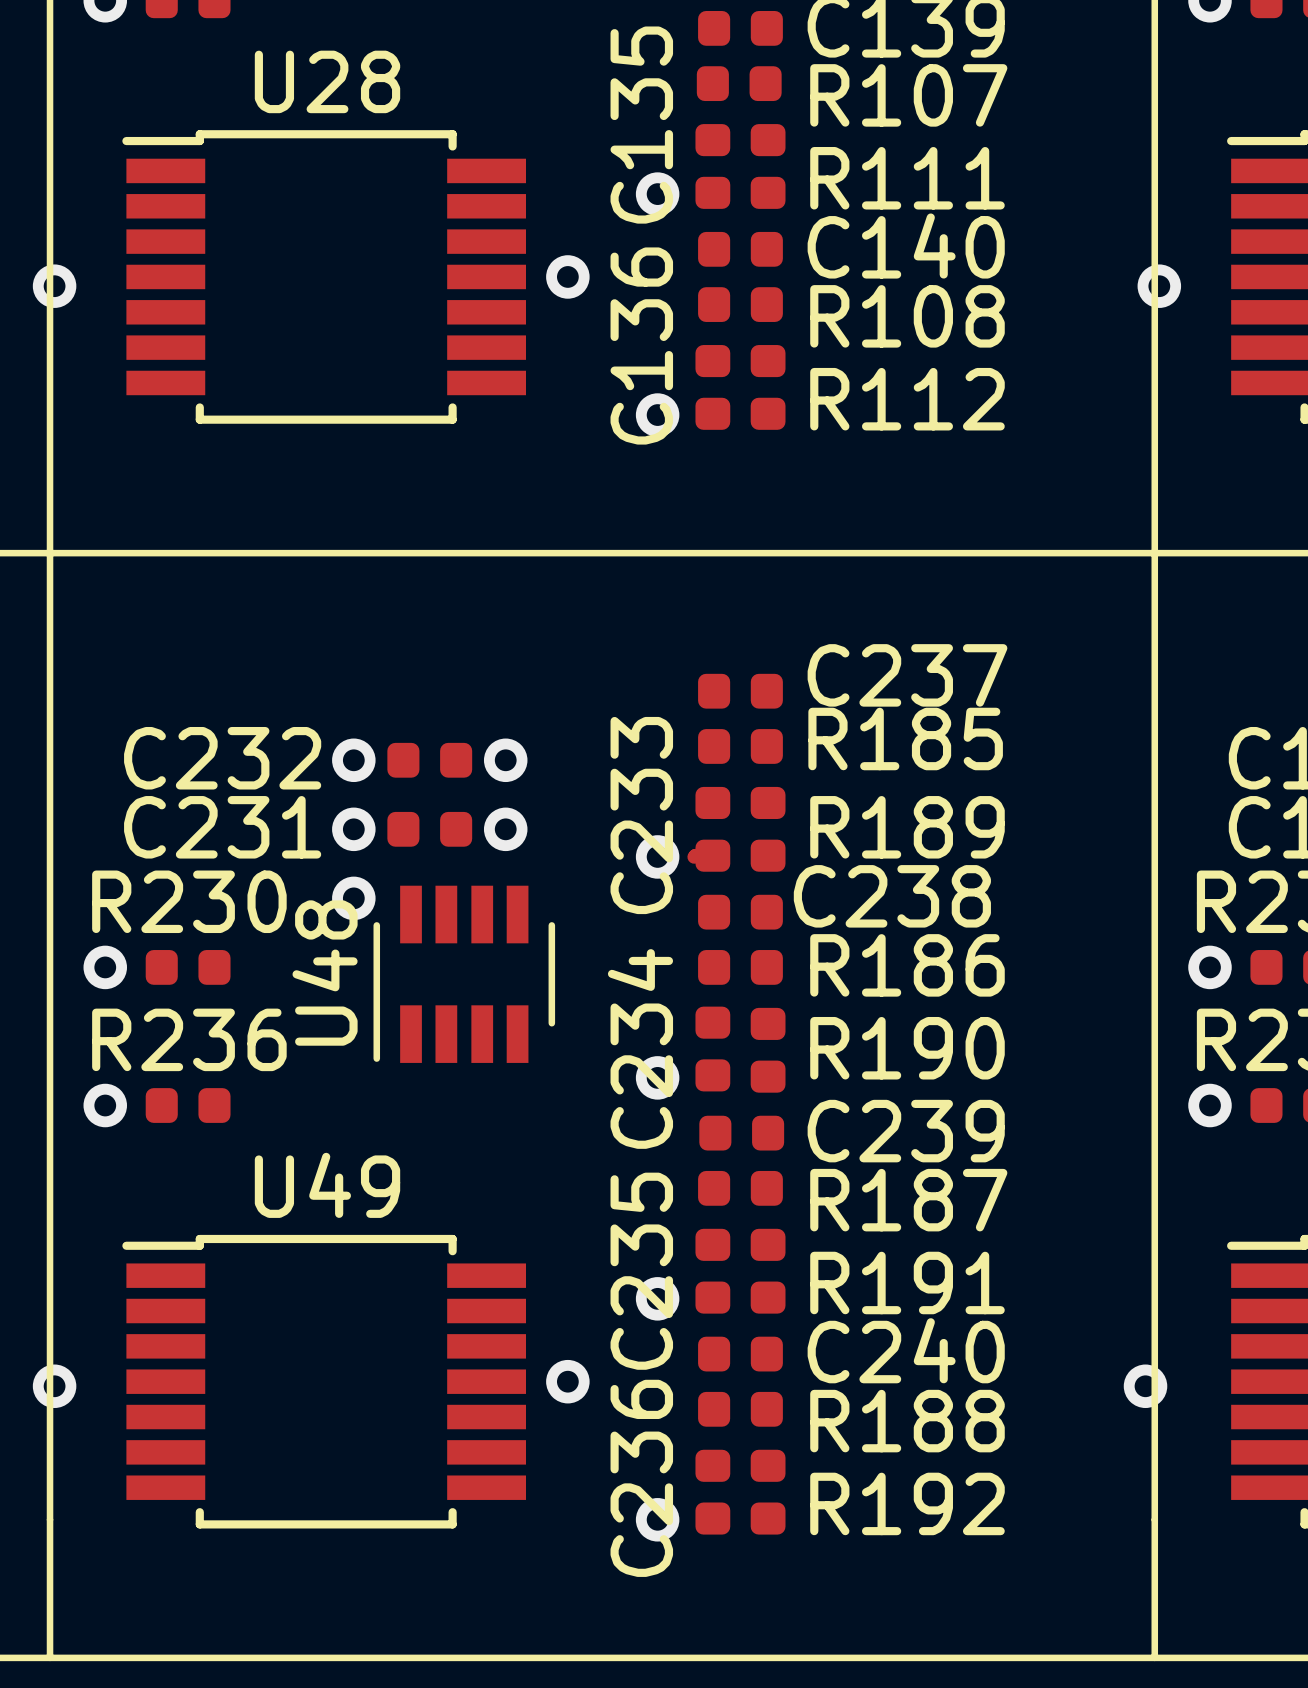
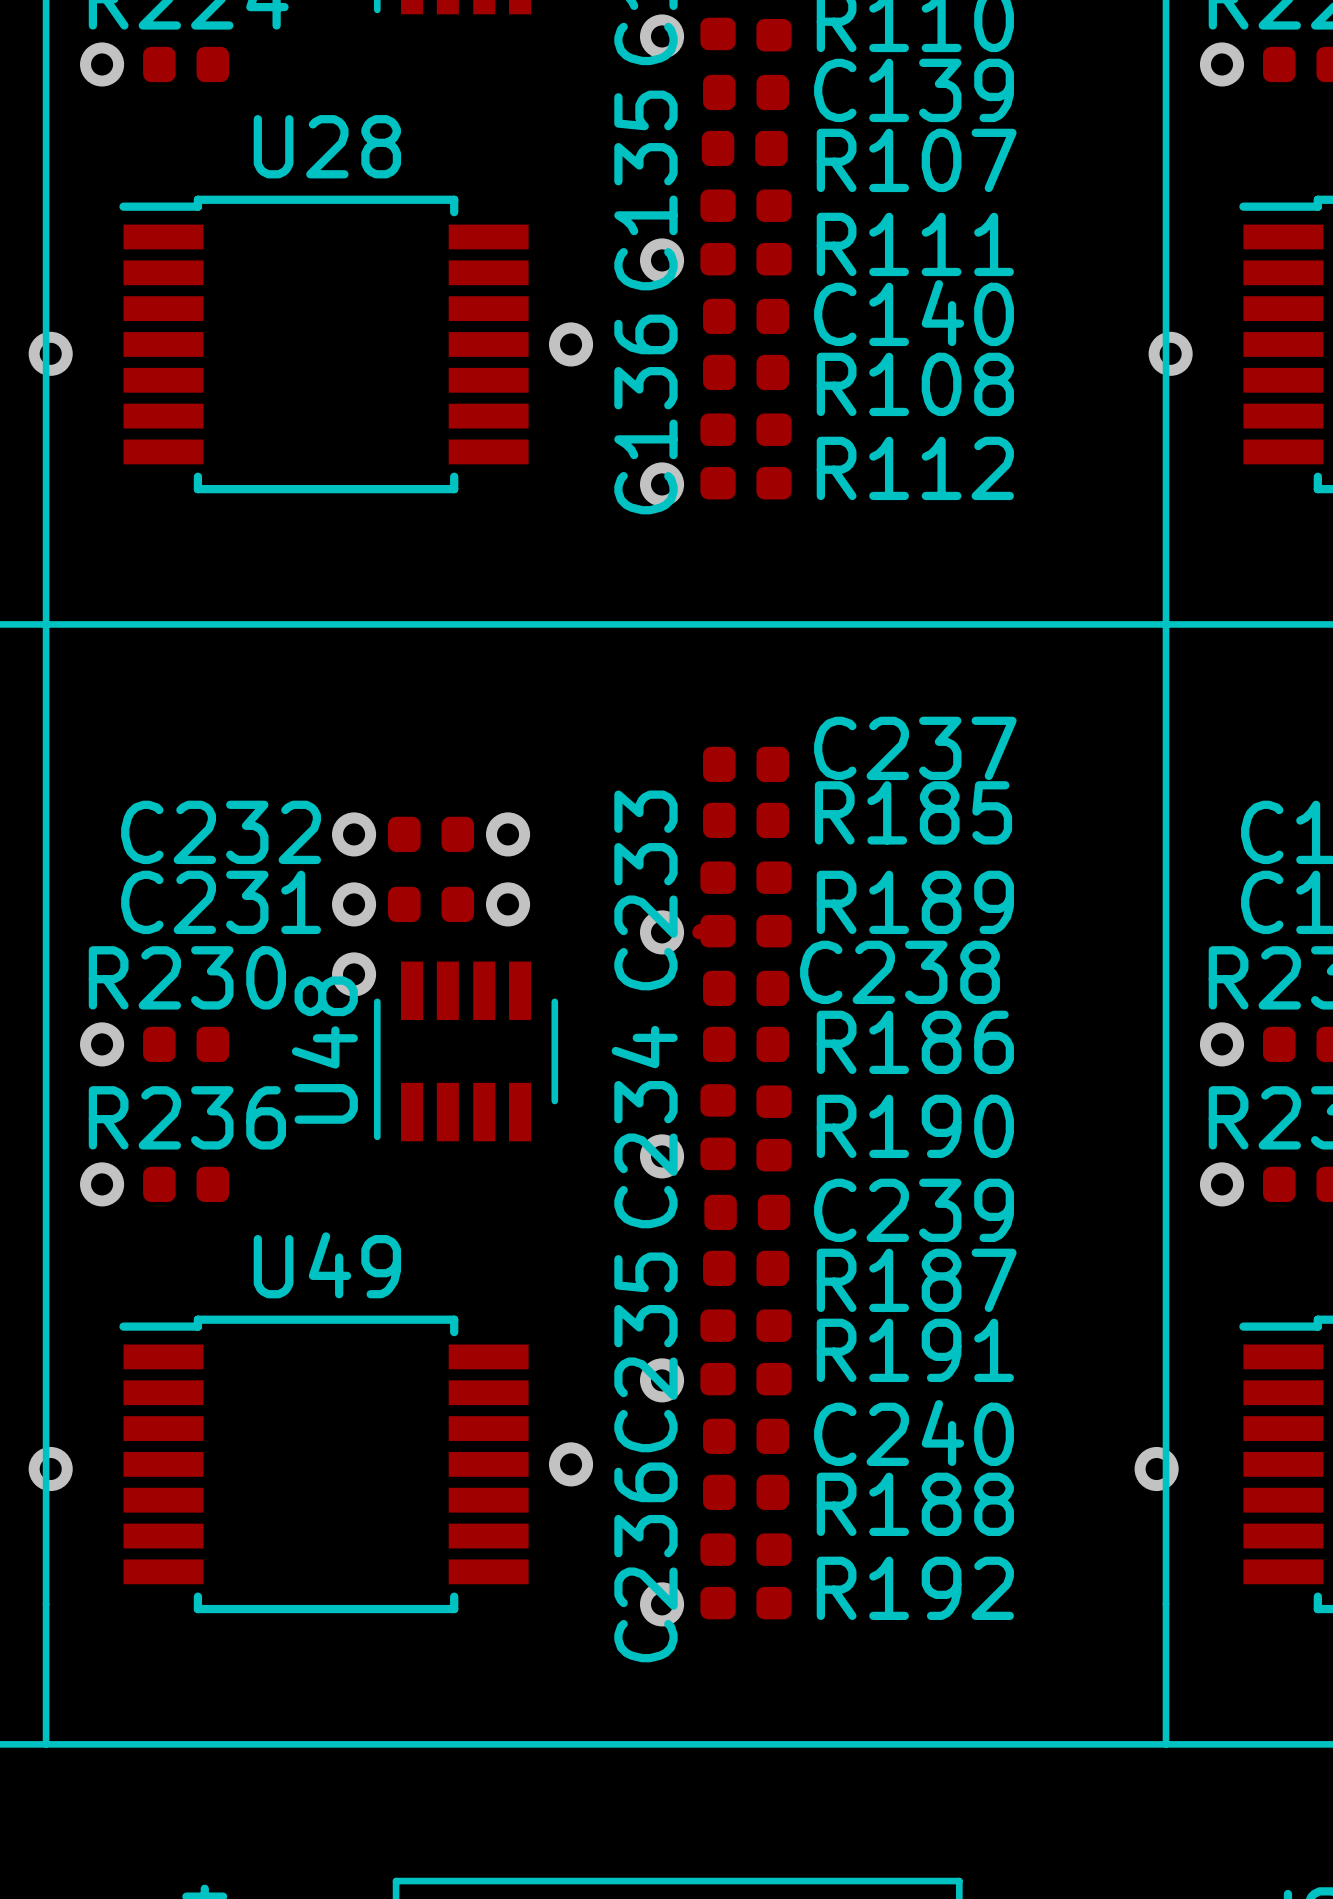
R191 name position: R191 (907, 1283) -> R191 (915, 1350)

